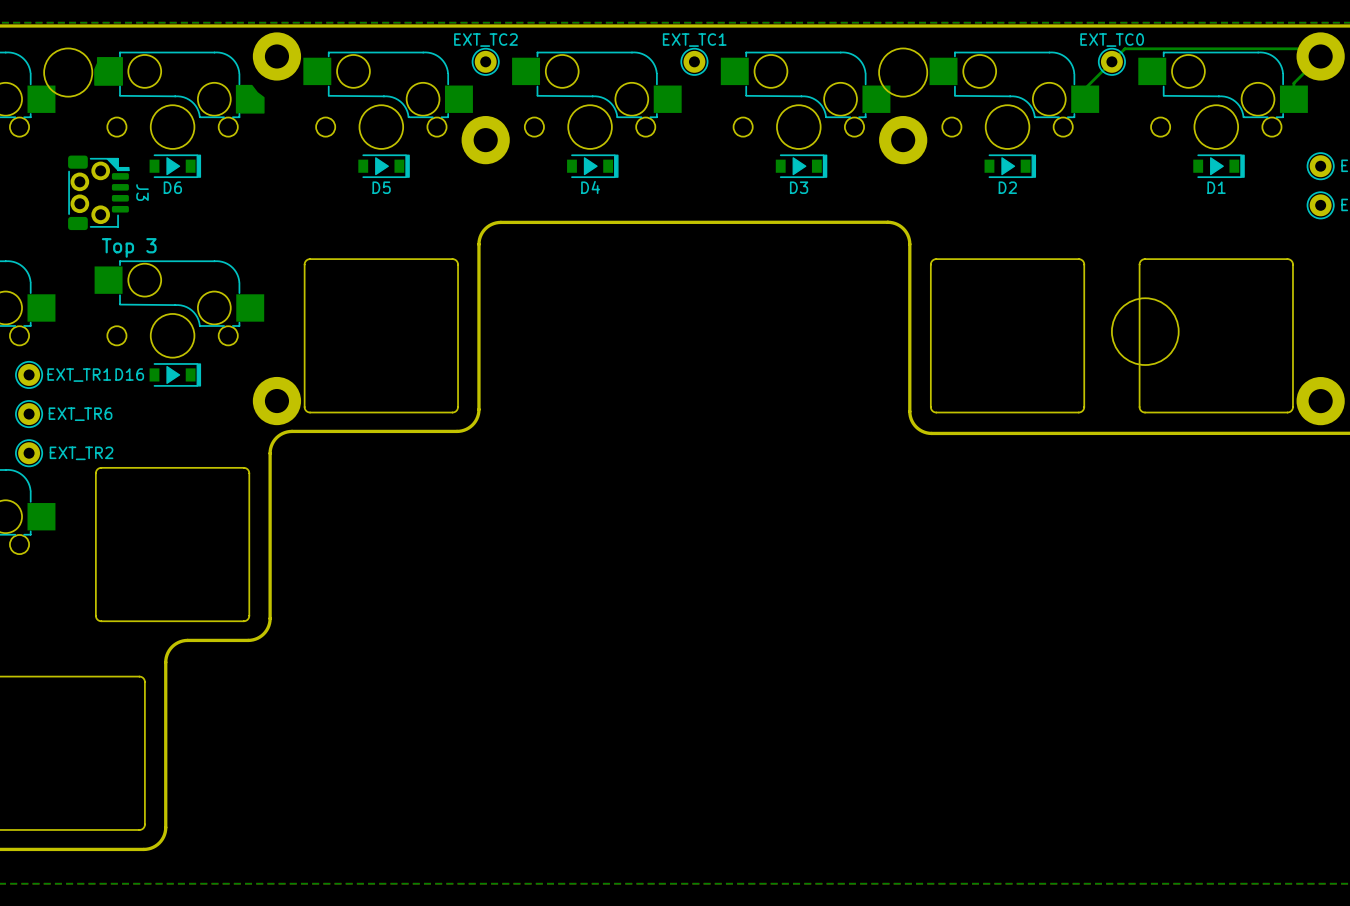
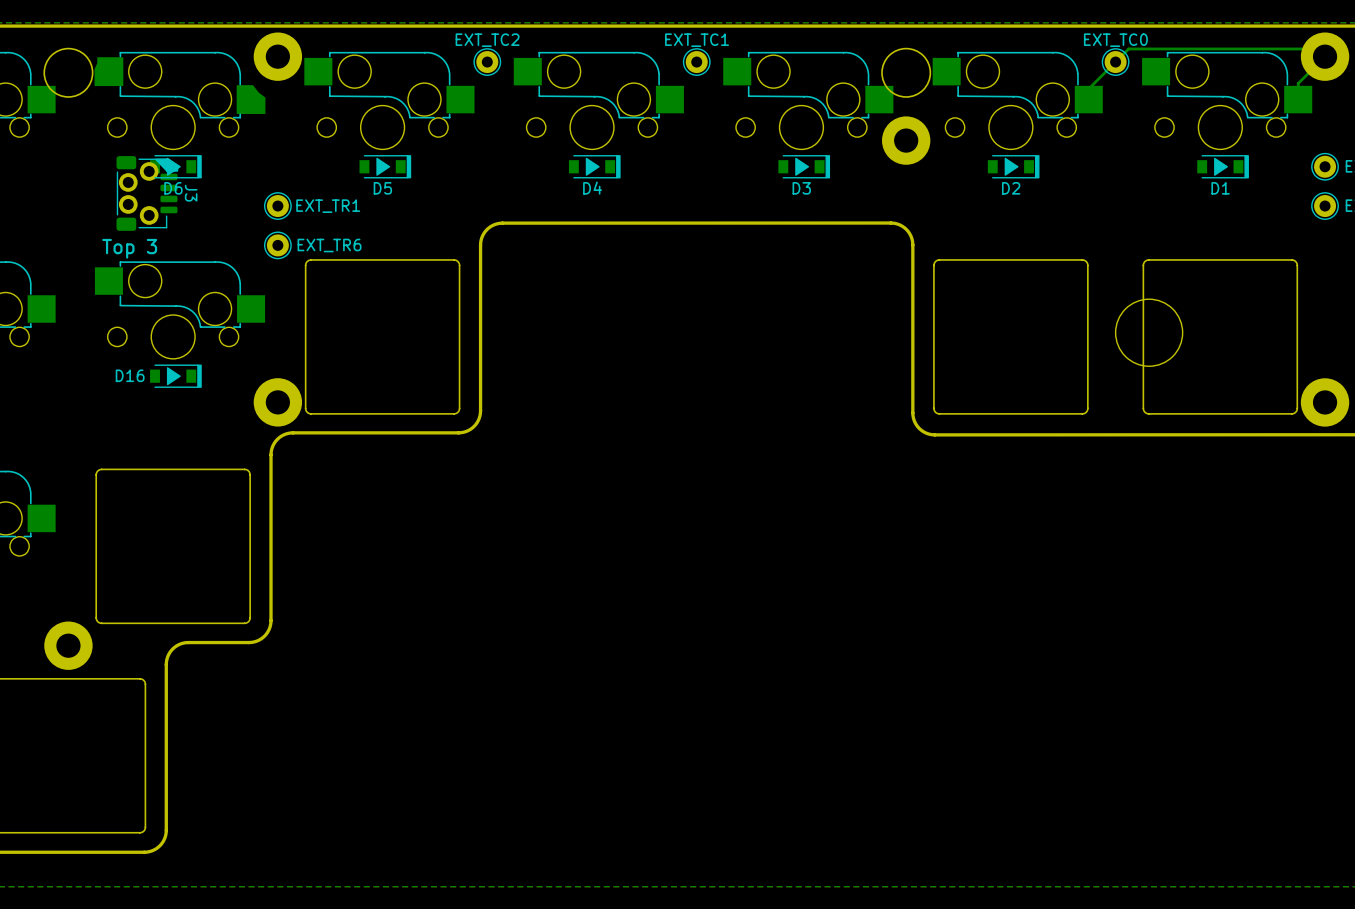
part: (485, 140) -> none
J3 position: (98, 192) -> (147, 193)
EXT_TR1 position: (29, 374) -> (277, 206)
EXT_TR6 position: (29, 414) -> (277, 245)
EXT_TR2: (29, 453) -> none
part: none -> (68, 645)

